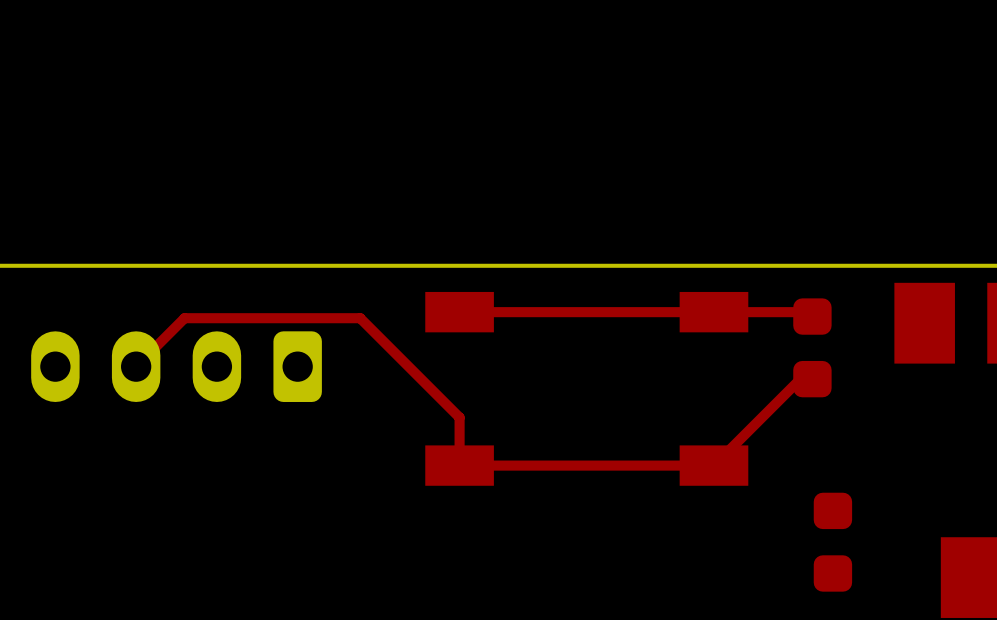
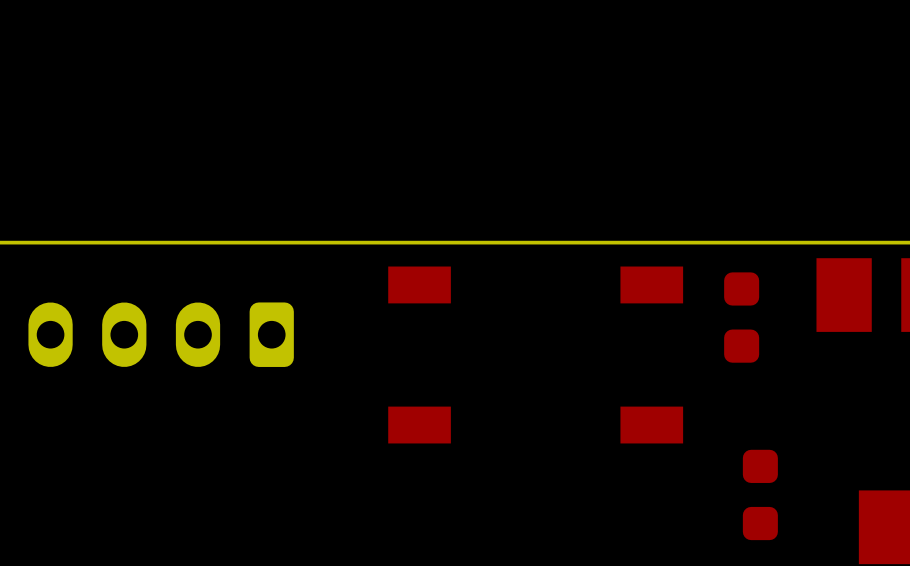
top track: (459, 312) (808, 312) (812, 316) -> none
top track: (136, 366) (184, 318) (360, 318) (459, 417) (459, 465) (713, 465) (800, 379) (812, 379) -> none

